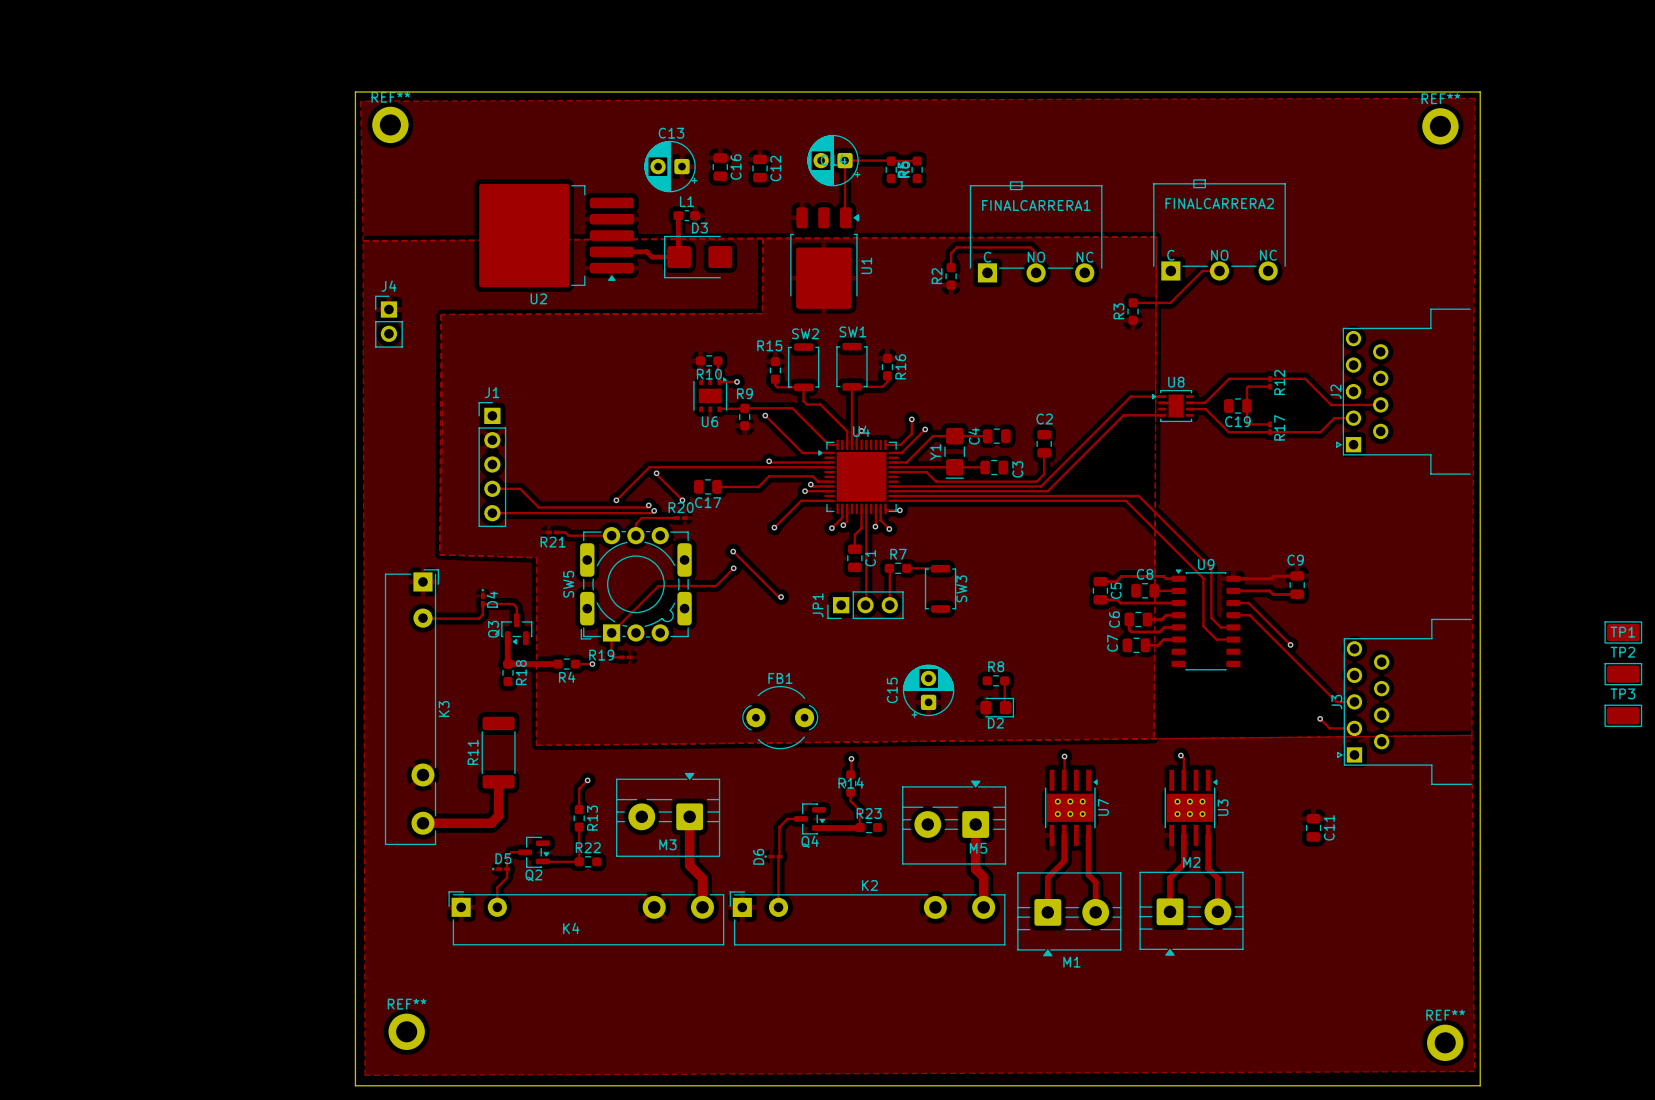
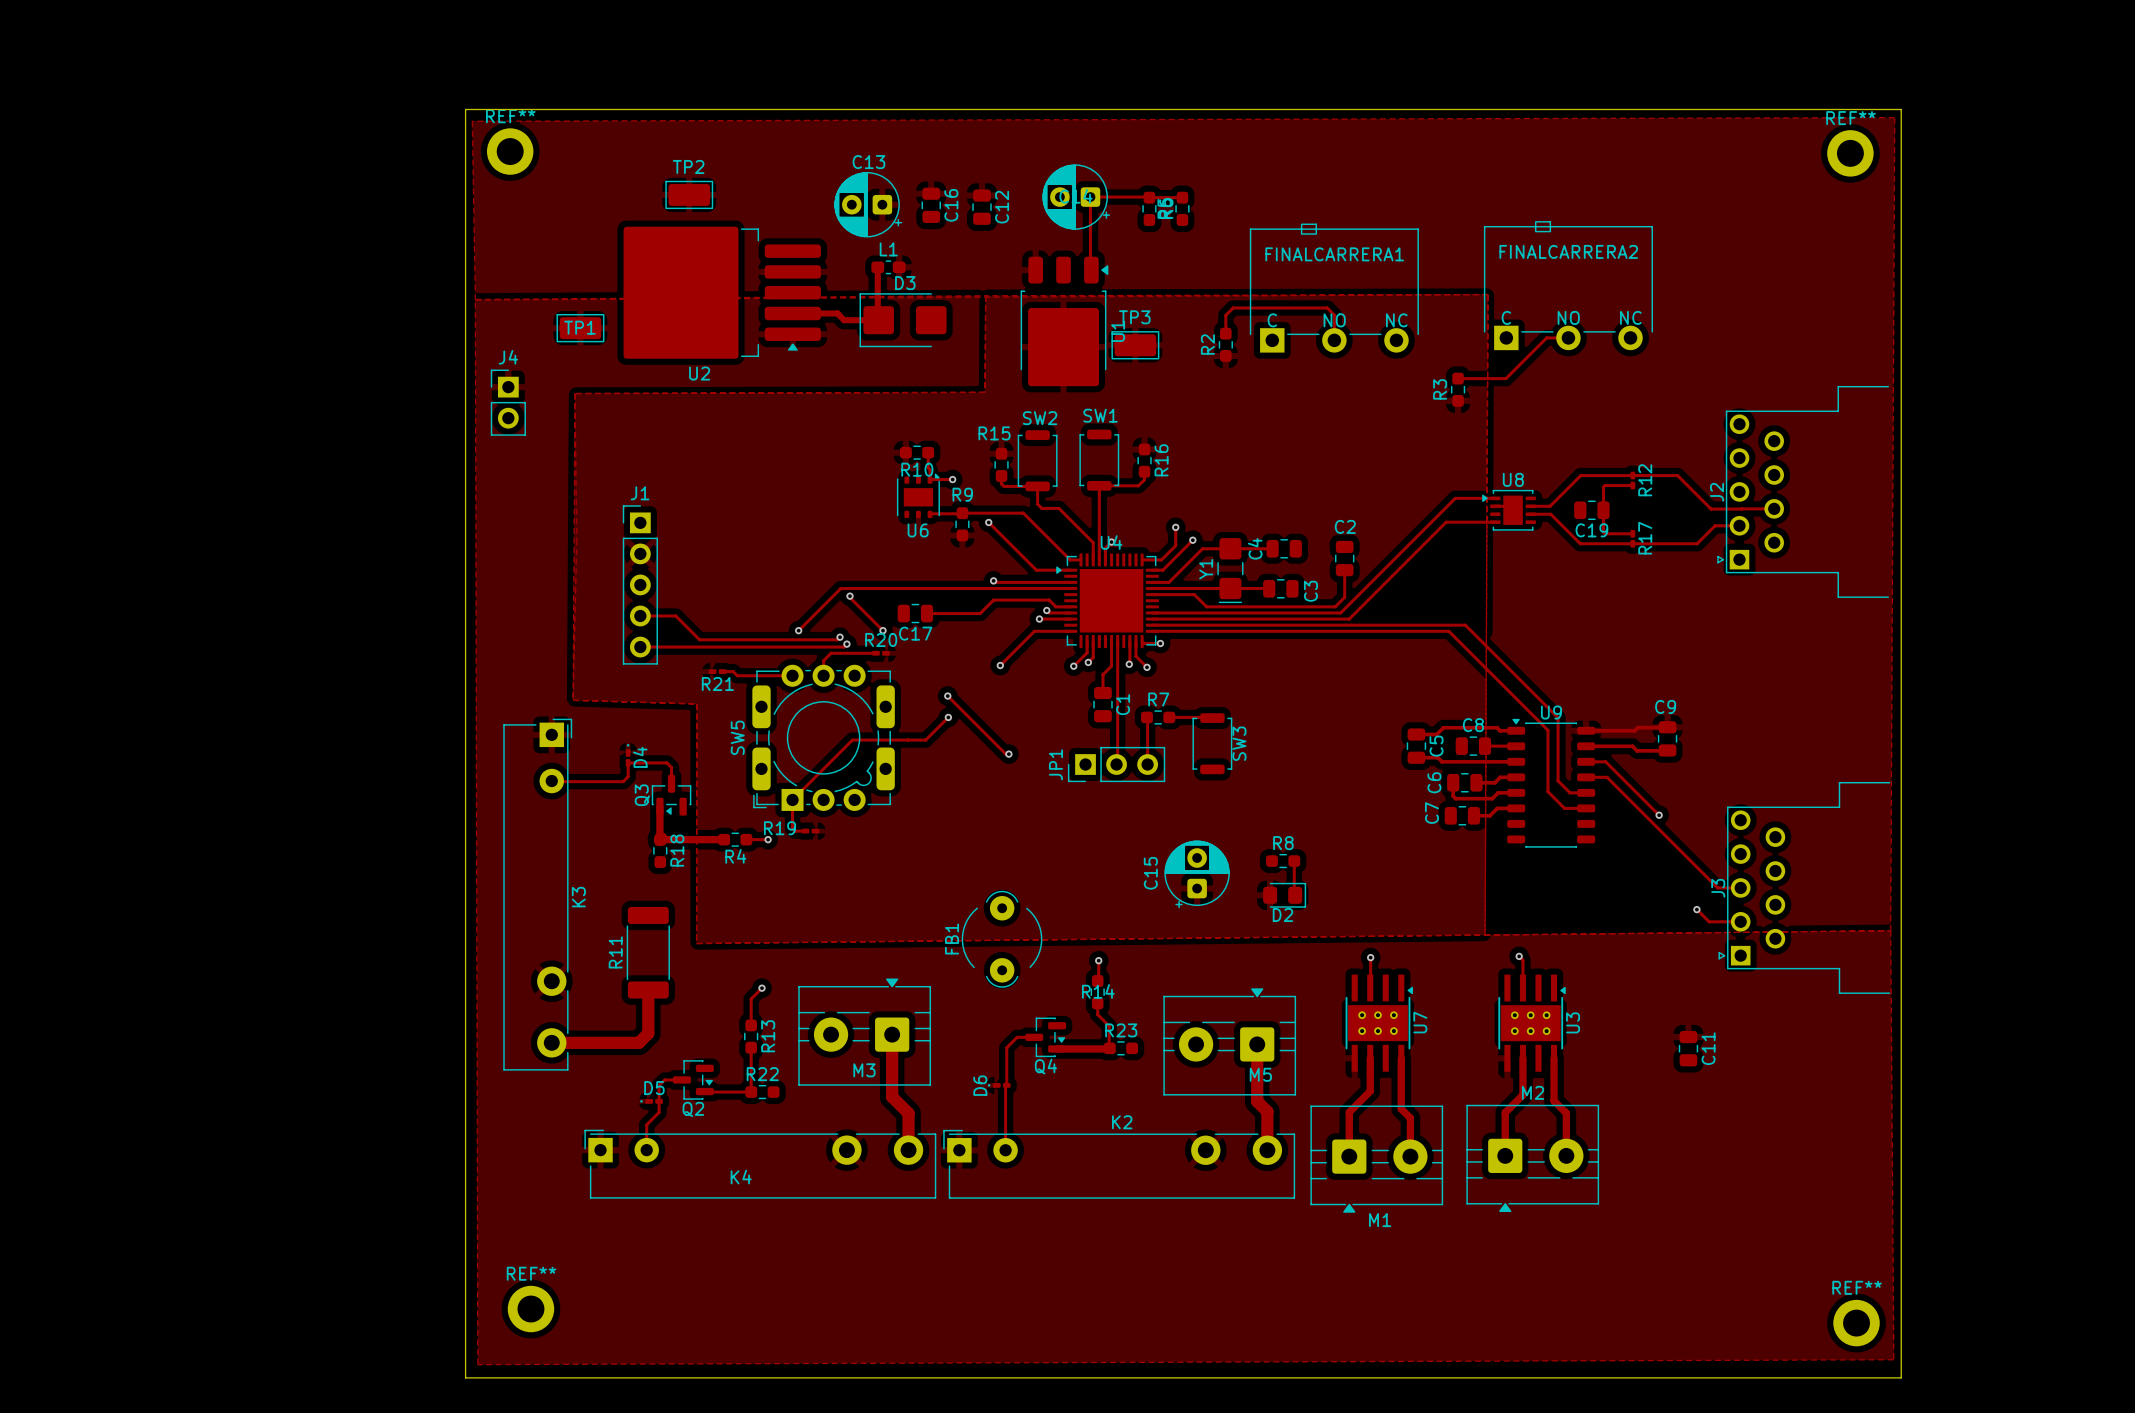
TP1 position: (1623, 632) -> (580, 328)
TP2 position: (1623, 674) -> (689, 194)
TP3 position: (1623, 715) -> (1135, 345)
FB1 rotation: 0° (780, 717) -> 90° counterclockwise (1002, 939)

